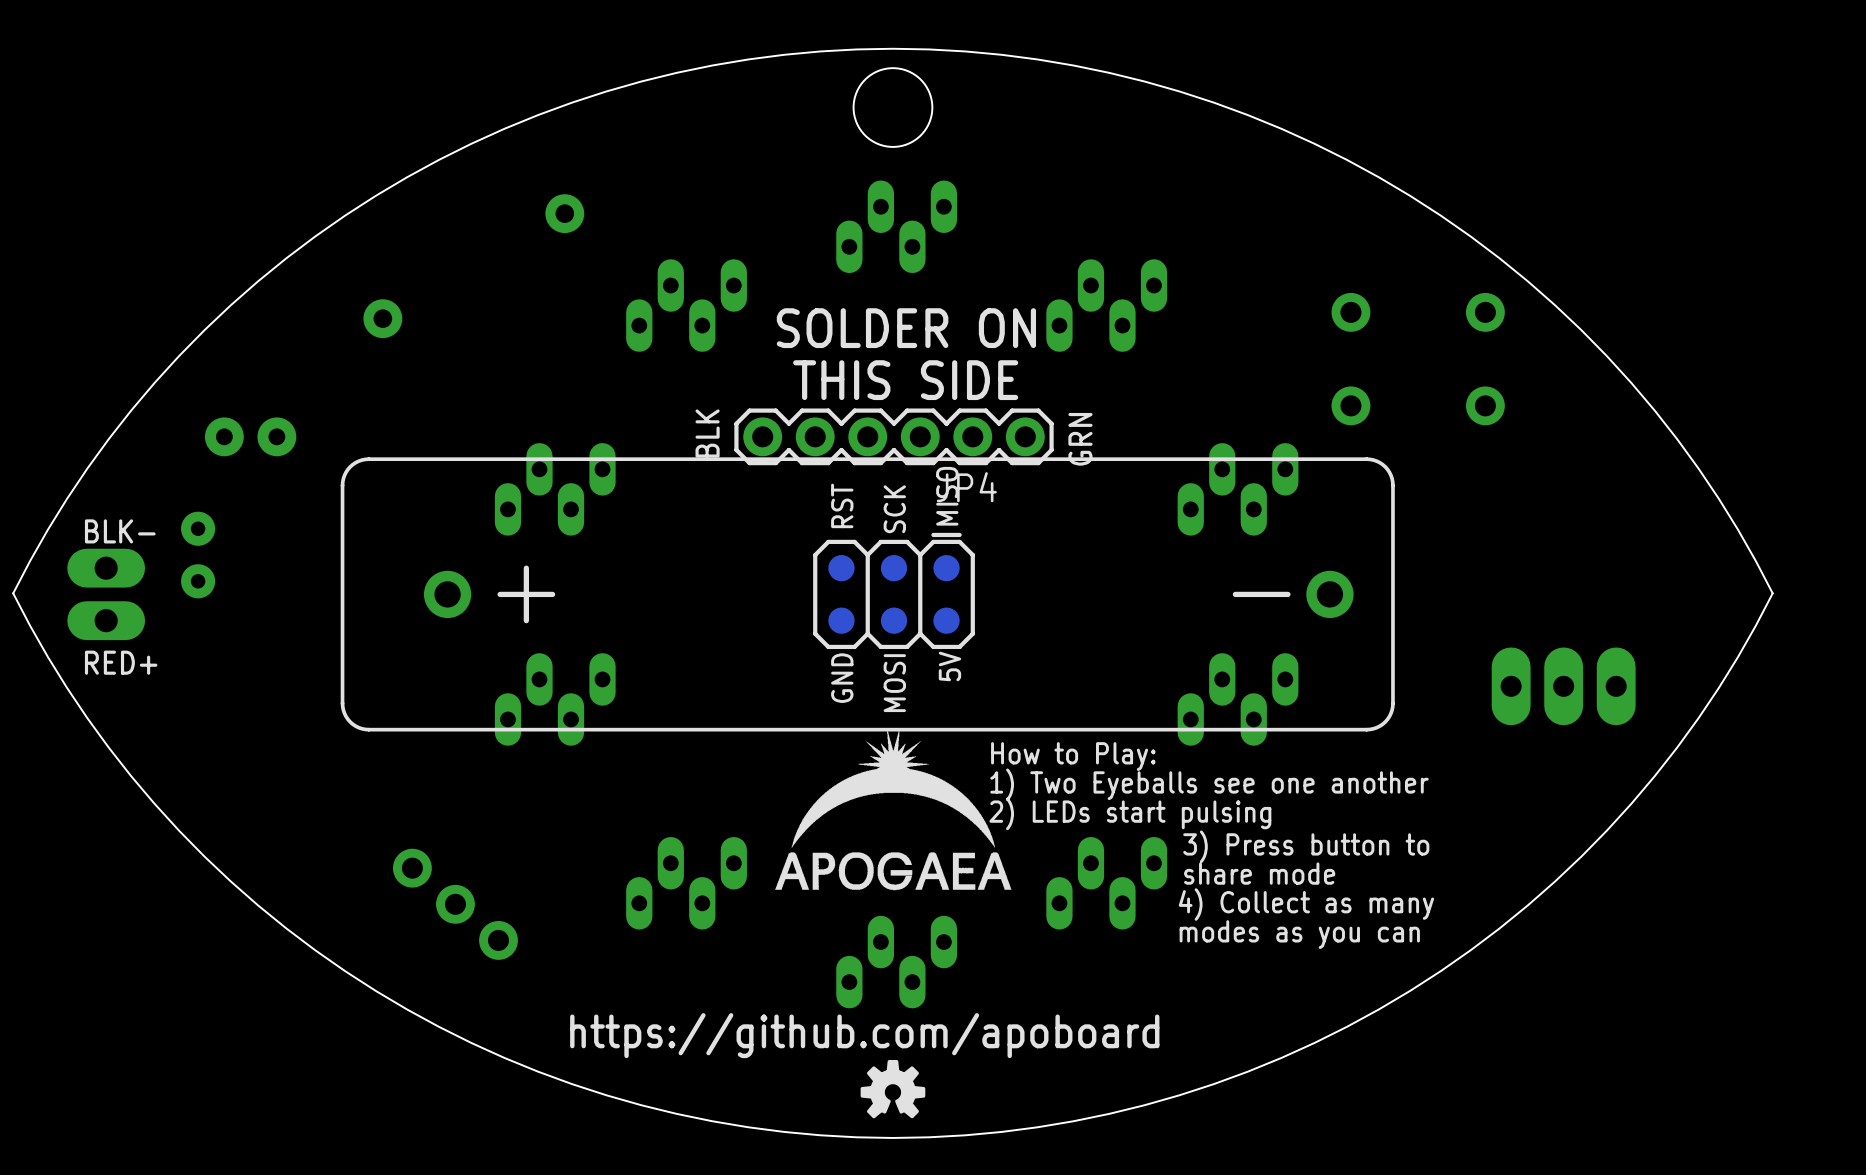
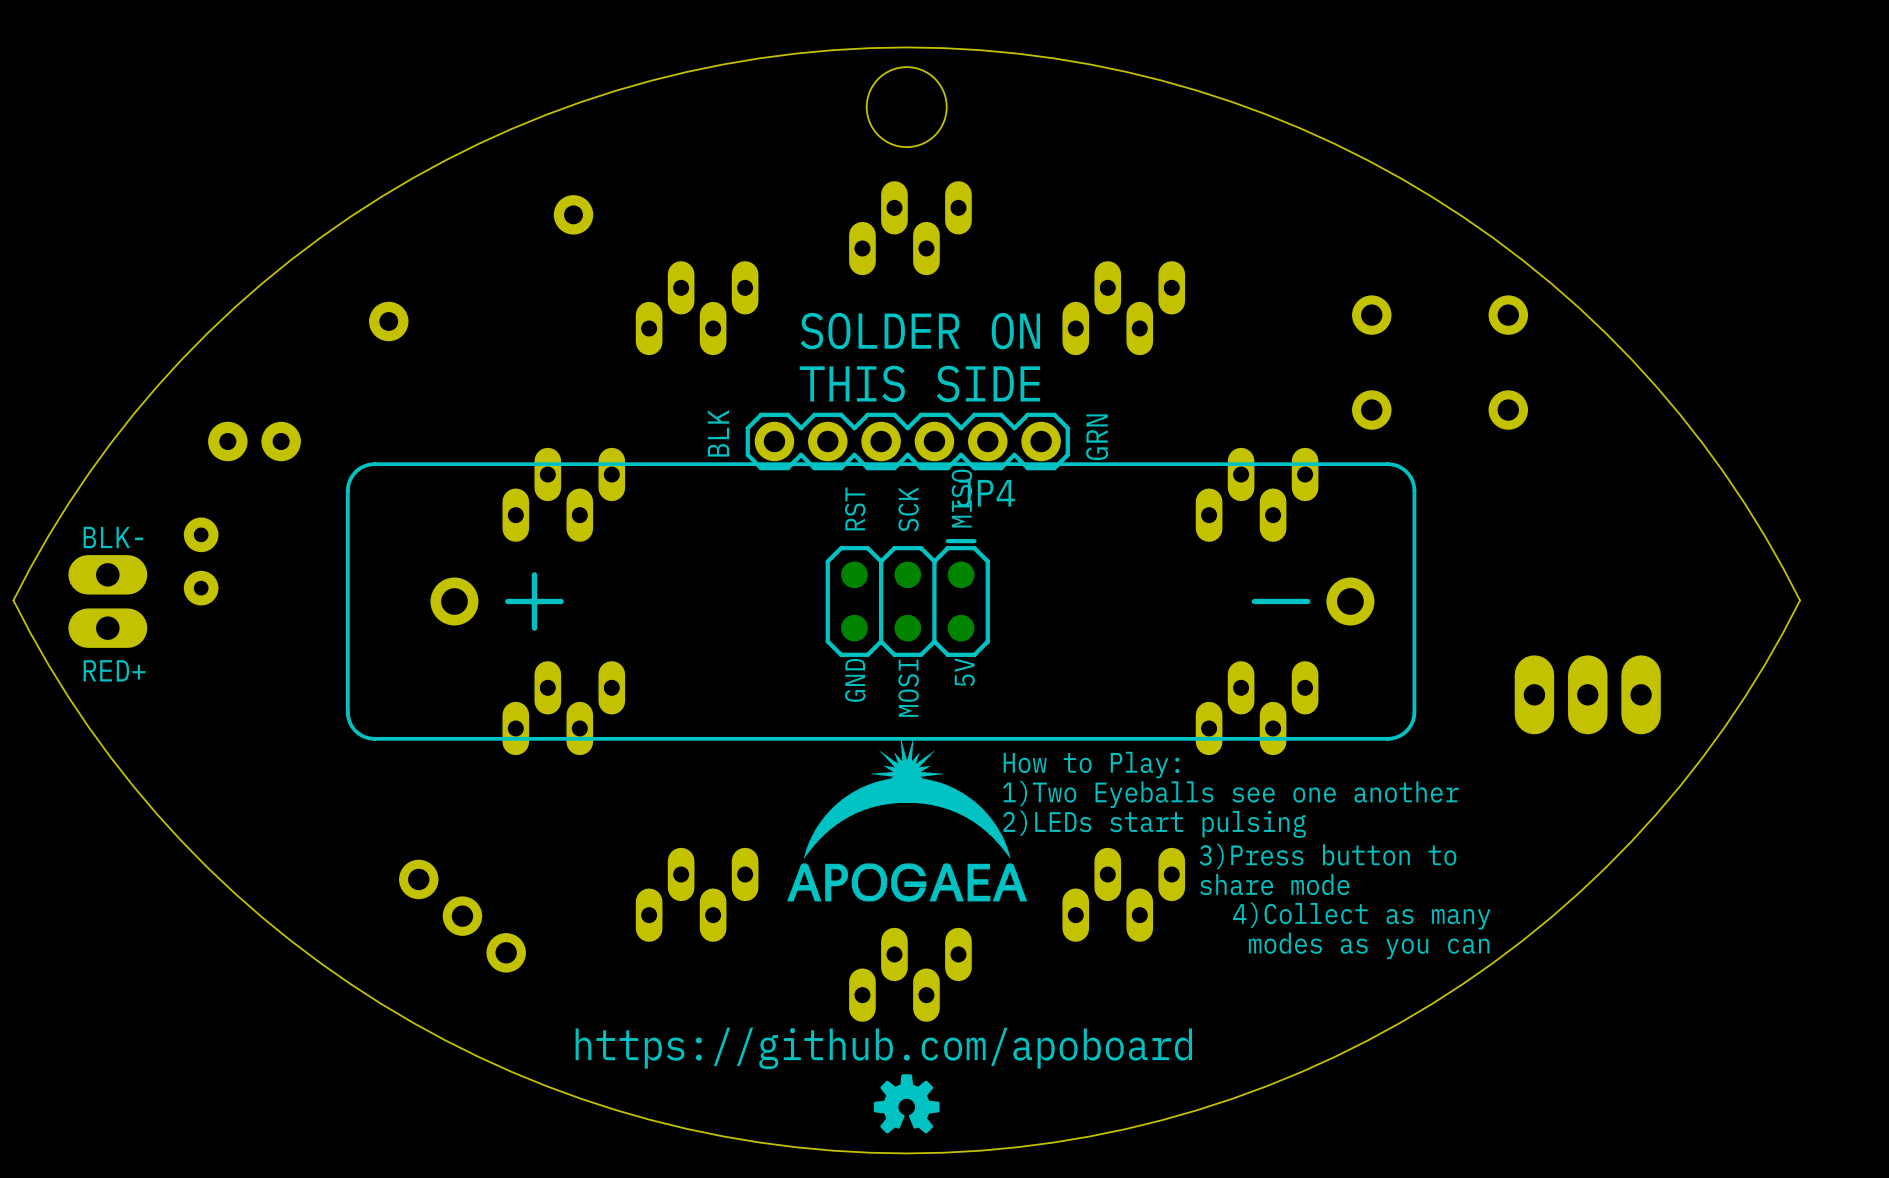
text: 1) Two Eyeballs see one another (1209, 784) -> 1)Two Eyeballs see one another (1230, 794)
text: 2) LEDs start pulsing (1130, 813) -> 2)LEDs start pulsing (1154, 824)
text: 3) Press button to (1306, 846) -> 3)Press button to (1327, 856)
text: 4) Collect as many (1306, 904) -> 4)Collect as many (1361, 915)
text position: modes as you can (1299, 934) -> modes as you can (1369, 945)

